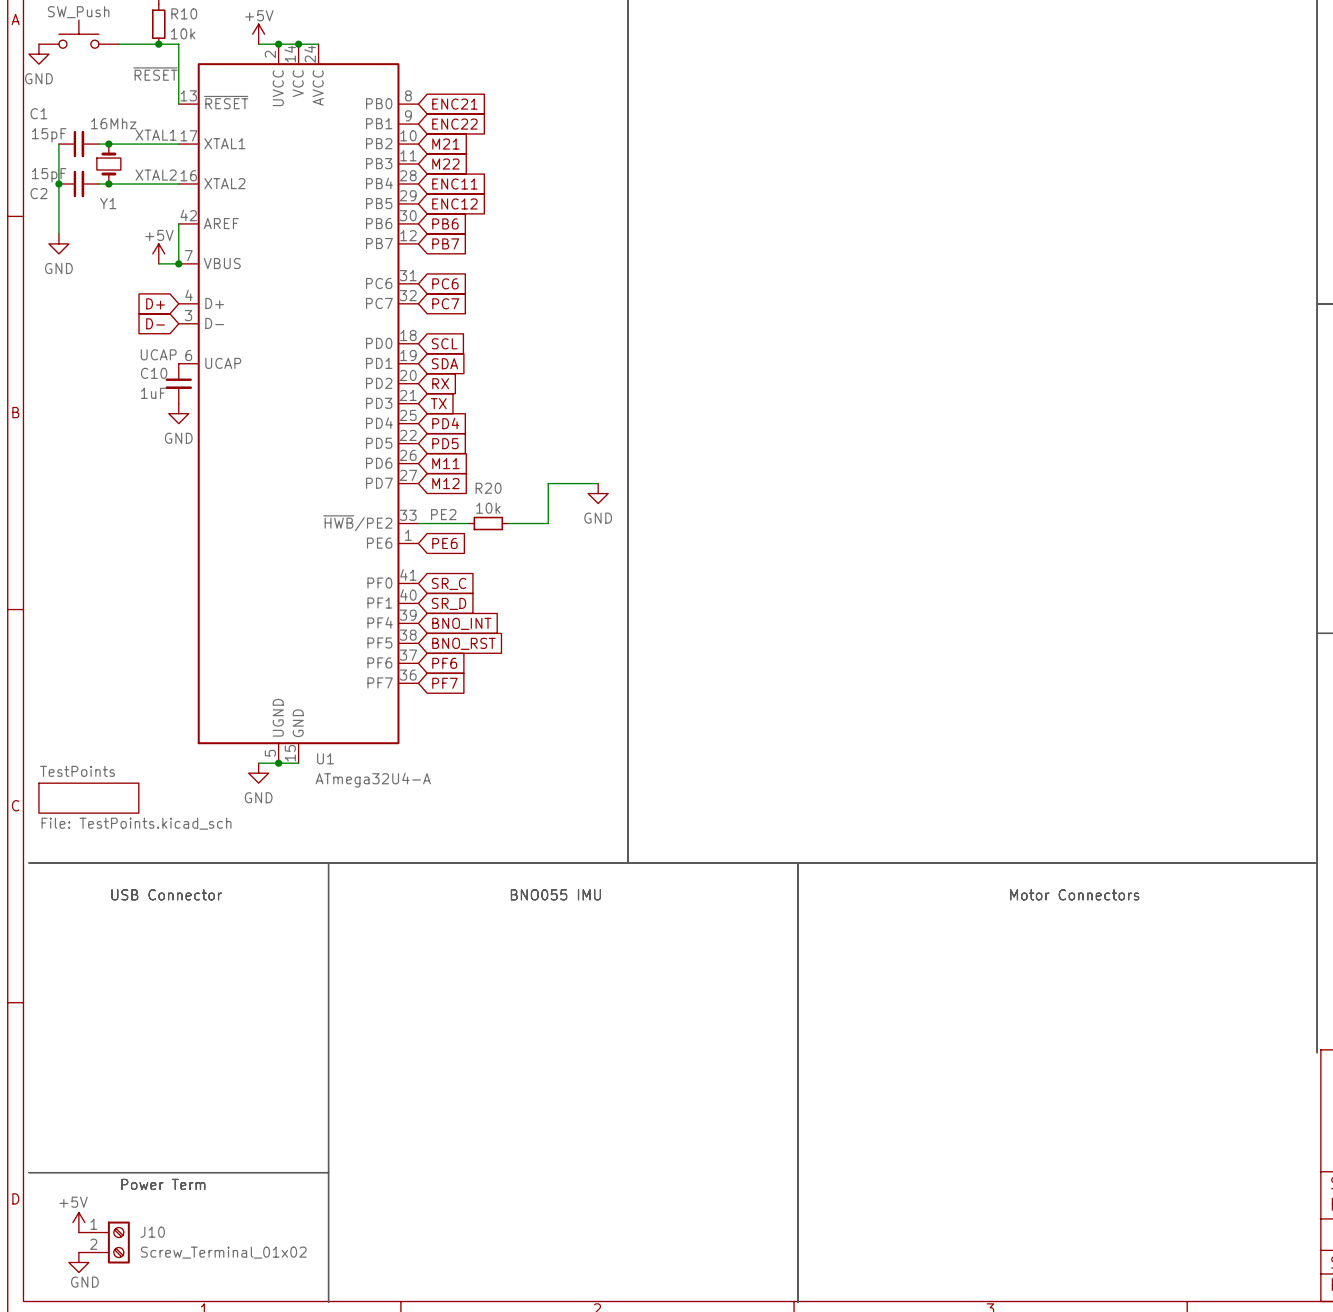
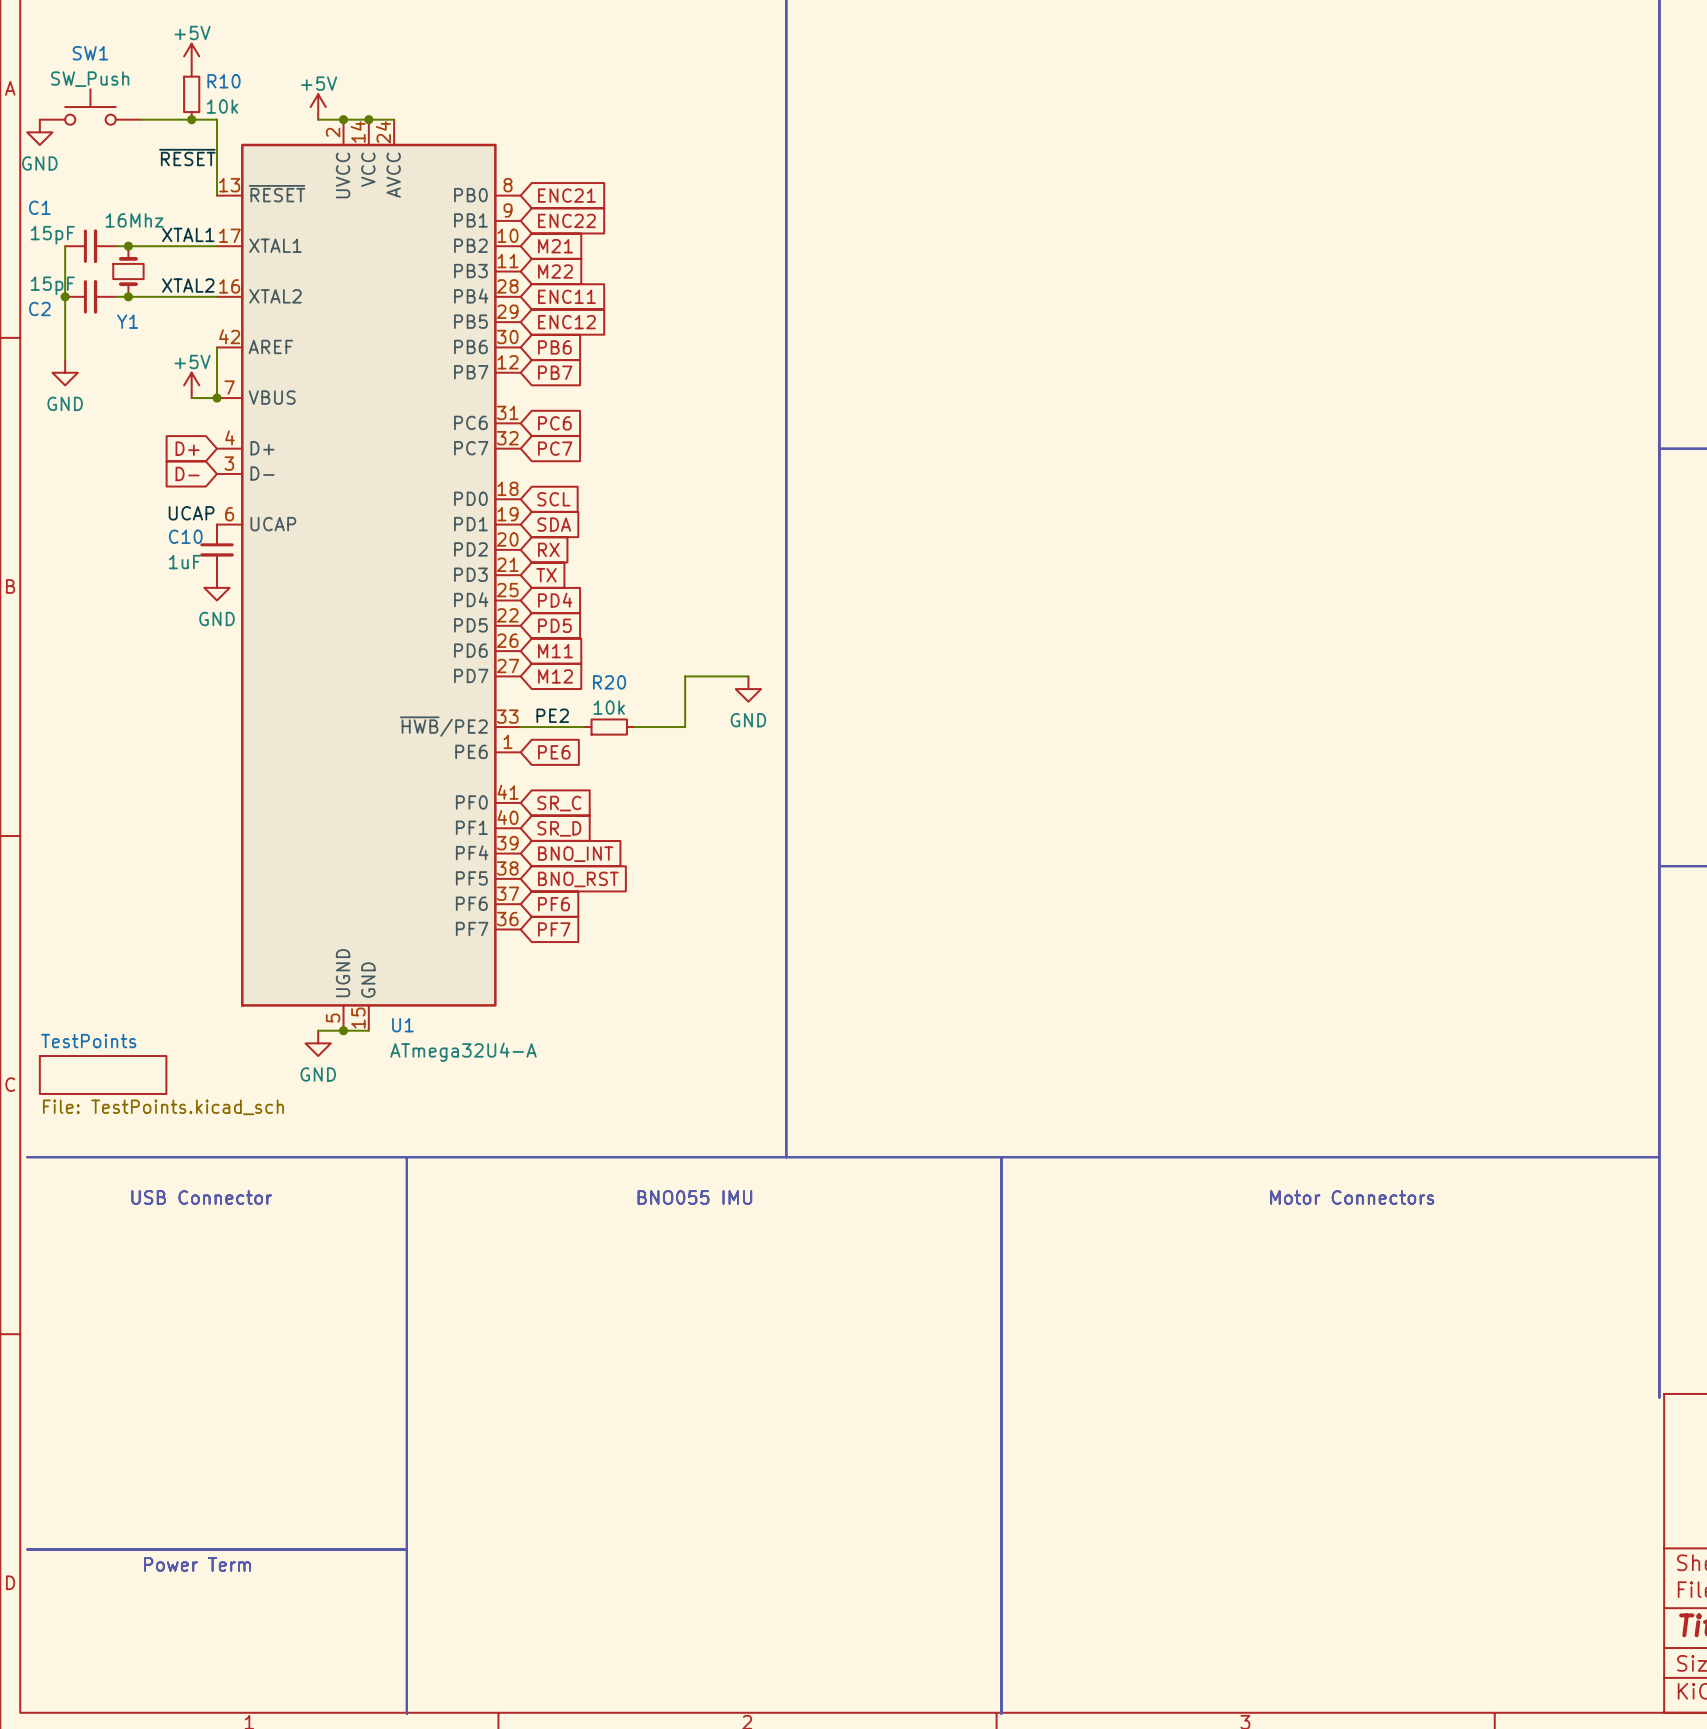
power symbol: +5V (78, 1222) -> none
J10: Screw_Terminal_01x02 (104, 1242) -> none
power symbol: GND (78, 1262) -> none

